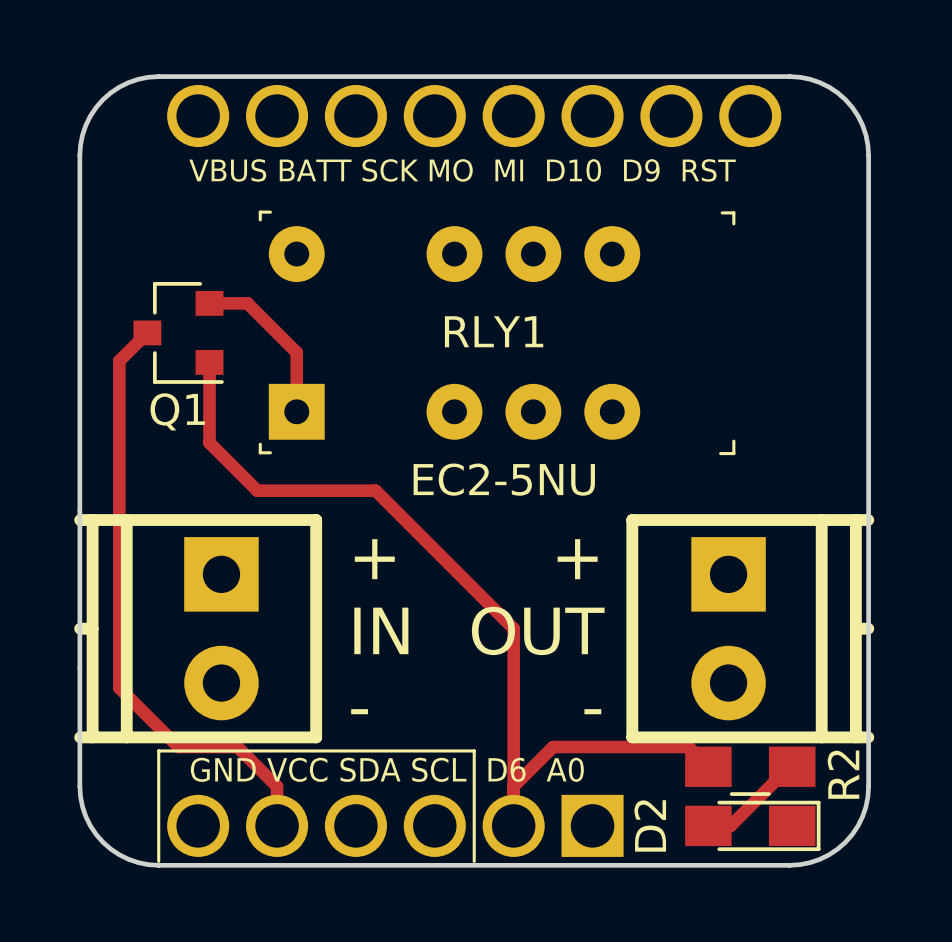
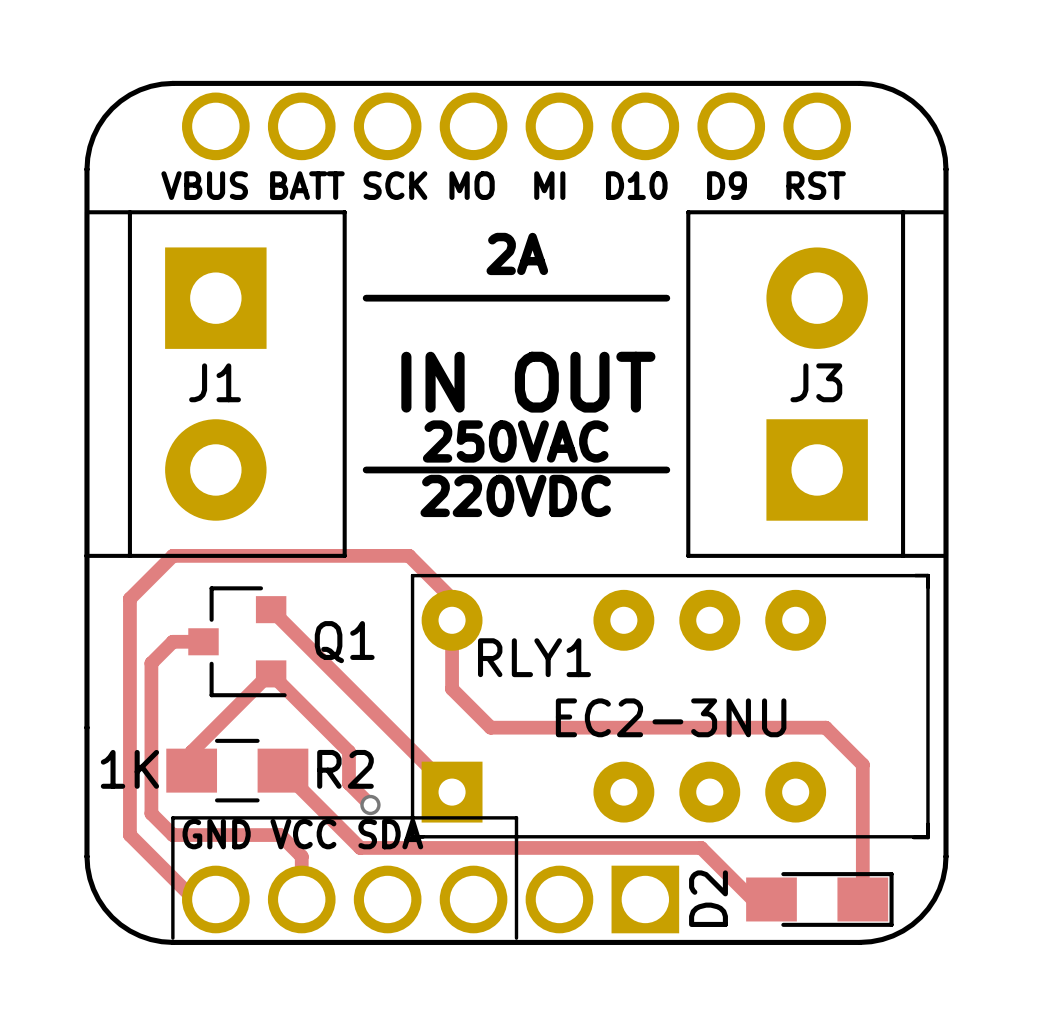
RLY1 footprint: [258, 210, 736, 456] -> [410, 573, 930, 840]
text: none -> 2A (517, 253)
line: none -> (366, 298) (666, 298)
track: (209, 303) (247, 303) (296, 352) (296, 411) -> none
RLY1 name position: RLY1 (494, 331) -> RLY1 (534, 657)
track: (147, 332) (119, 361) (119, 549) -> (862, 899) (862, 764) (825, 727) (490, 727) (452, 689) (452, 598) (409, 555) (172, 555) (129, 598)
Q1 position: (178, 332) -> (237, 641)
text: none -> IN OUT (528, 382)
J1: none -> (215, 384)
J3: none -> (817, 384)
track: (209, 362) (209, 442) (257, 490) (375, 490) (513, 628) (513, 825) -> none
text: none -> 250VAC (515, 441)
Q1 name position: Q1 (177, 411) -> Q1 (344, 642)
line: none -> (366, 469) (666, 469)
text: none -> 220VDC (515, 495)
RLY1 value: EC2-5NU (504, 479) -> EC2-3NU (671, 717)
track: none -> (271, 609) (452, 792)
text: + (374, 559) -> none
text: + (577, 559) -> none
track: none -> (203, 641) (172, 641) (151, 663) (151, 813) (172, 835) (280, 835)
part: (198, 628) -> none
part: (750, 628) -> none
text: IN (381, 630) -> none
text: OUT (538, 630) -> none
track: (119, 687) (178, 747) (237, 747) (257, 766) -> (129, 749) (129, 835) (194, 899) (215, 899)
R2 value: none -> 1K (129, 769)
track: none -> (191, 770) (191, 751) (271, 673) (348, 751) (348, 783) (370, 804)
text: - (359, 711) -> none
text: - (592, 711) -> none
via: none -> (370, 804)
part text: none -> GND VCC SDA (302, 834)
track: (708, 766) (688, 747) (553, 747) (513, 786) -> none
R2 position: (750, 766) -> (237, 770)
track: (792, 766) (789, 766) (730, 825) (708, 825) -> (282, 770) (360, 847) (701, 847) (752, 899) (771, 899)
part text: GND VCC SDA SCL D6 A0 (387, 769) -> none
R2 name rotation: 0° (843, 774) -> 90° clockwise (345, 769)

